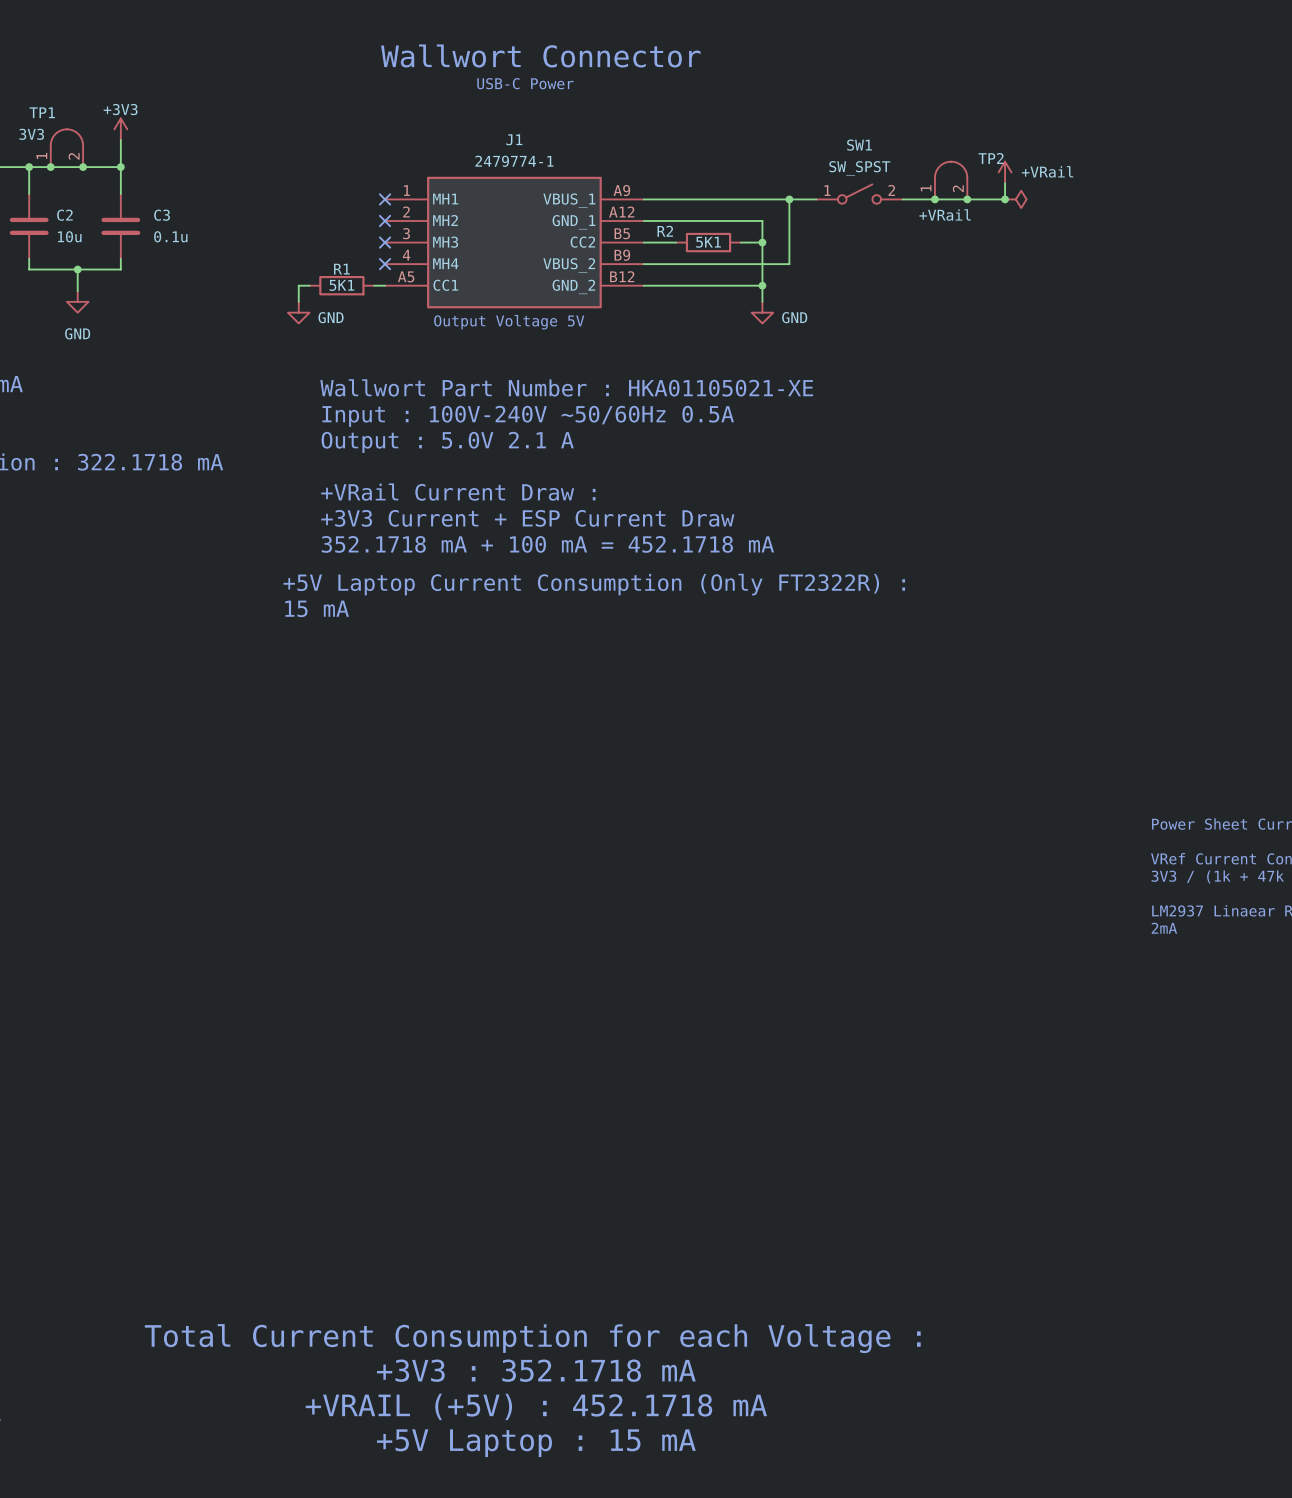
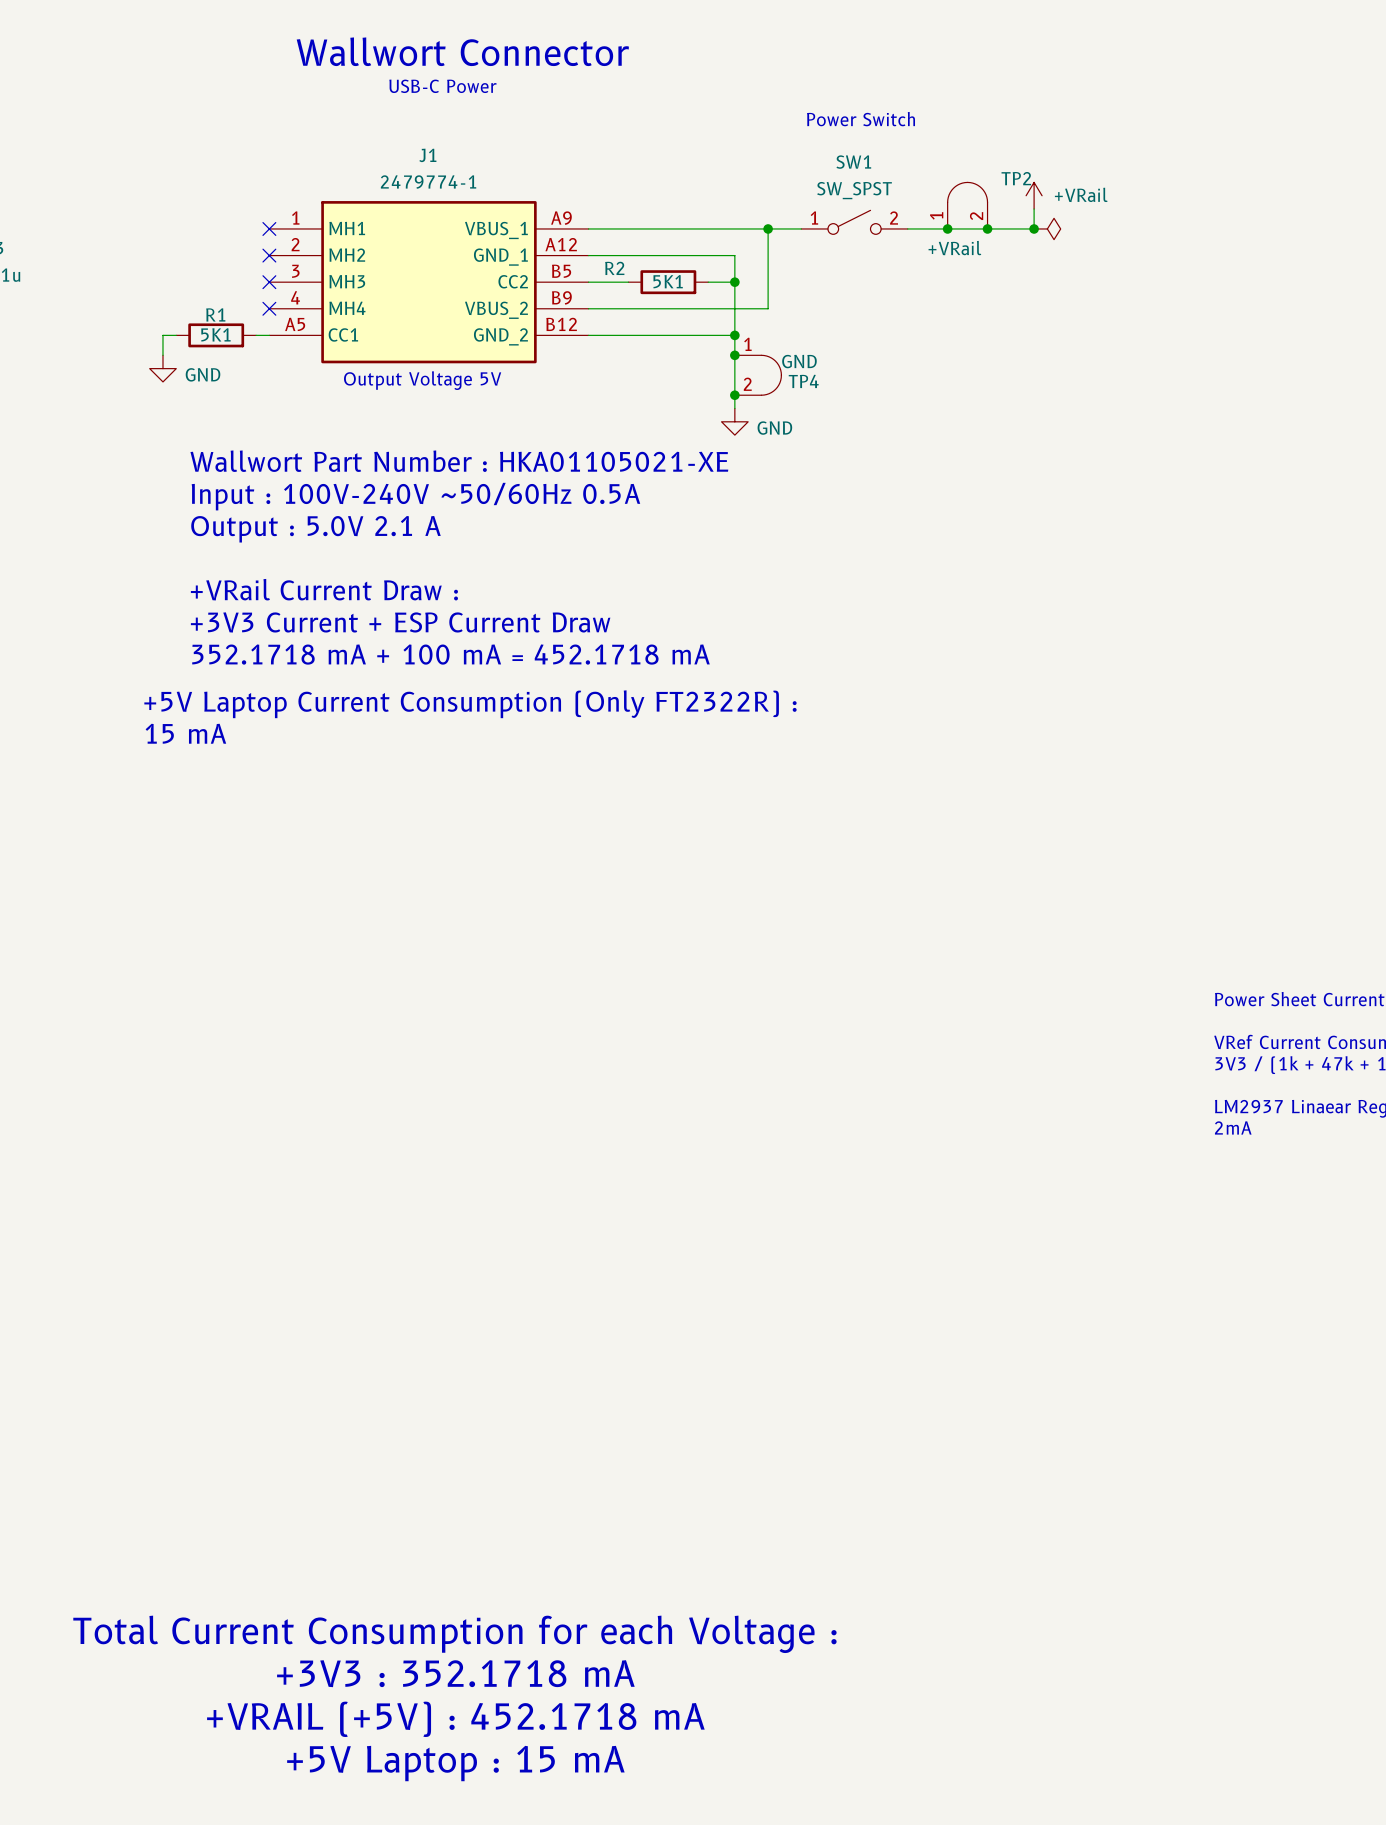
text: none -> Power Switch (861, 119)
wire: none -> (734, 355) (734, 408)
junction: none -> (734, 355)
power symbol position: GND (762, 312) -> GND (734, 421)
TP4: none -> GND (758, 375)
junction: none -> (734, 395)

